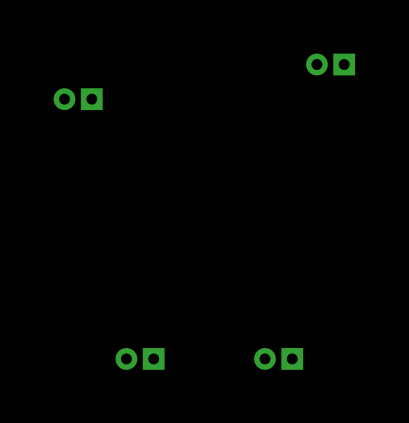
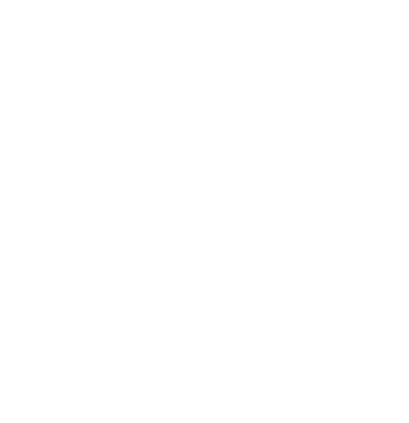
part: (330, 64) -> none
part: (78, 99) -> none
part: (140, 358) -> none
part: (278, 358) -> none

